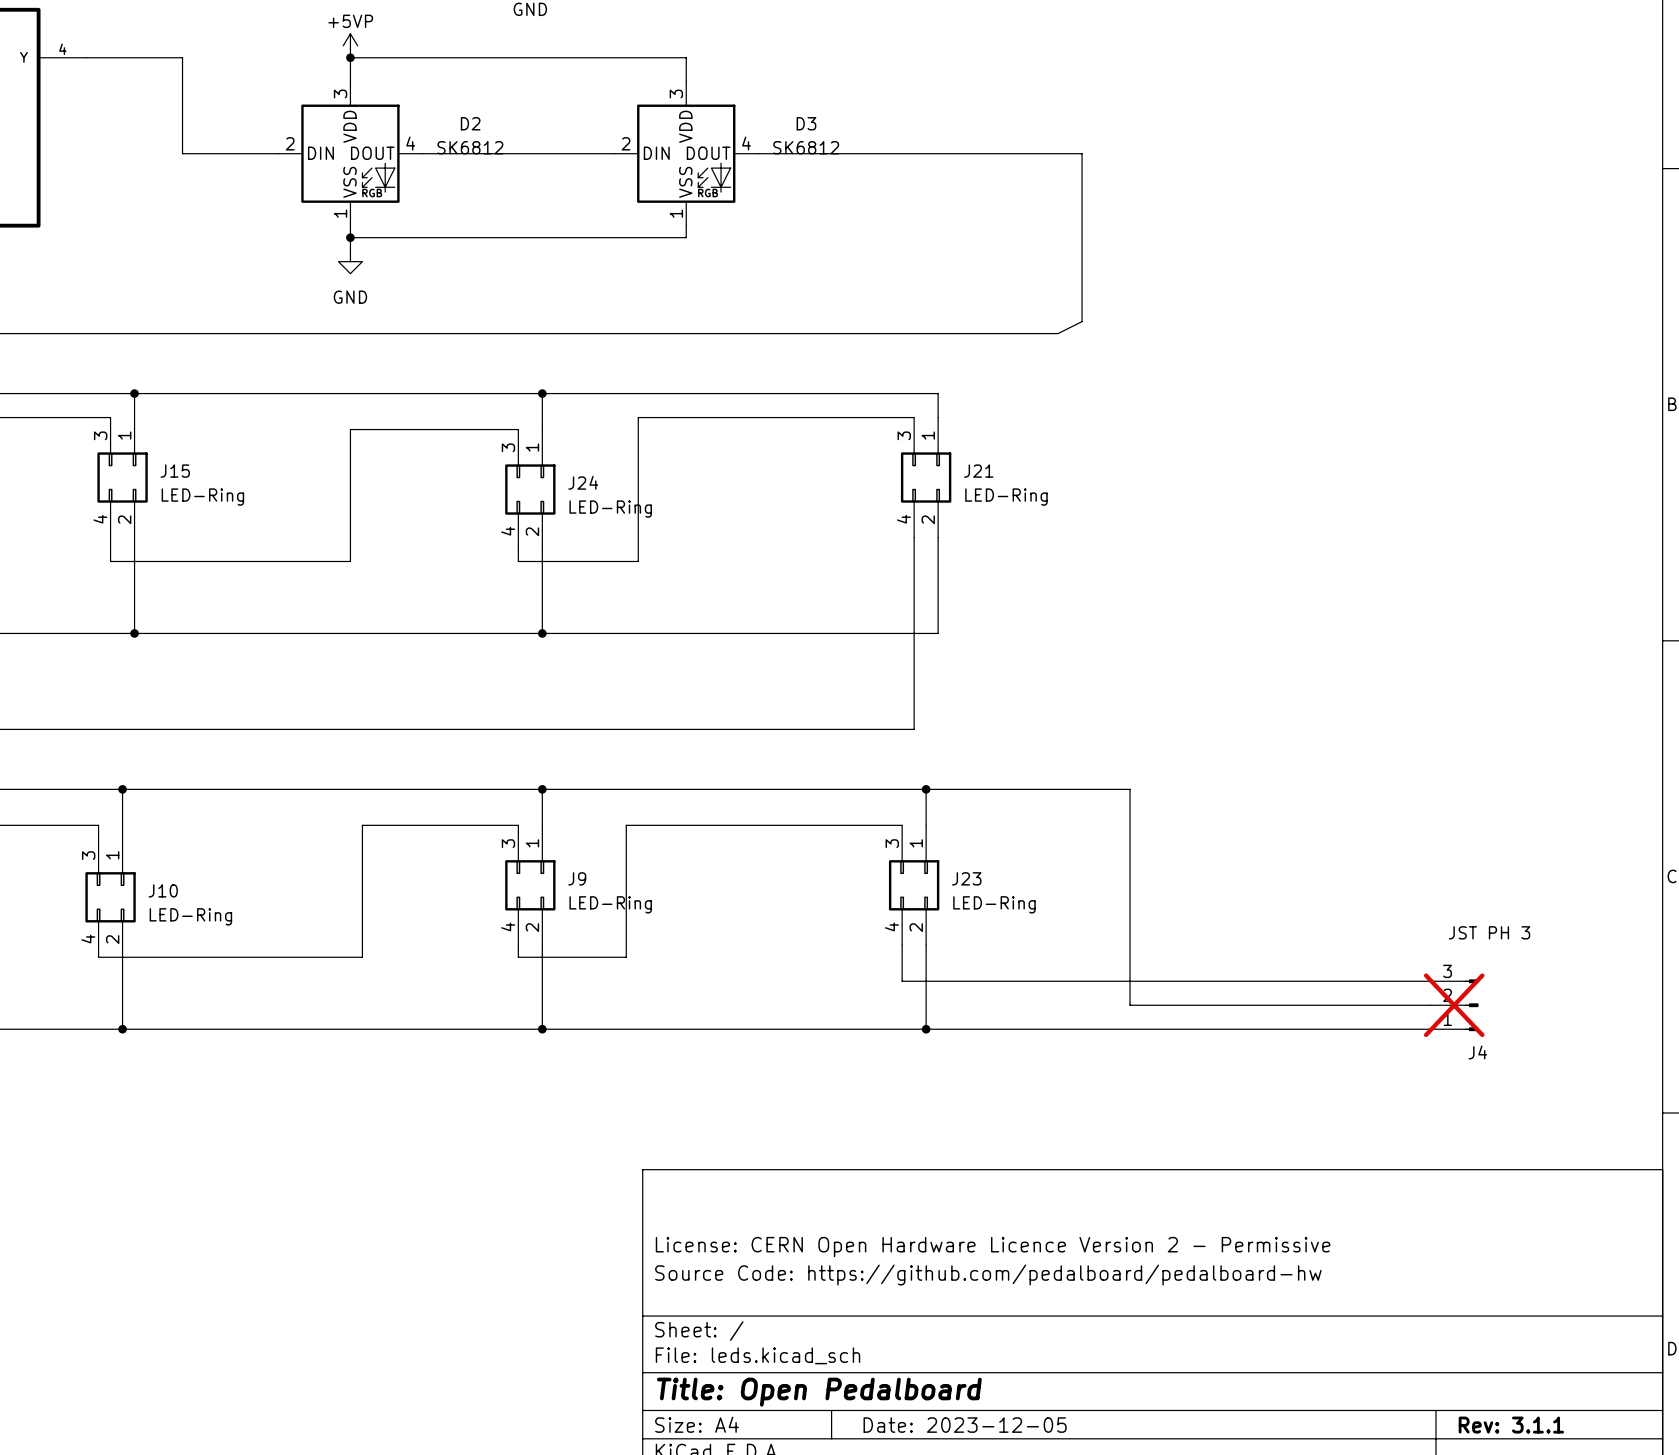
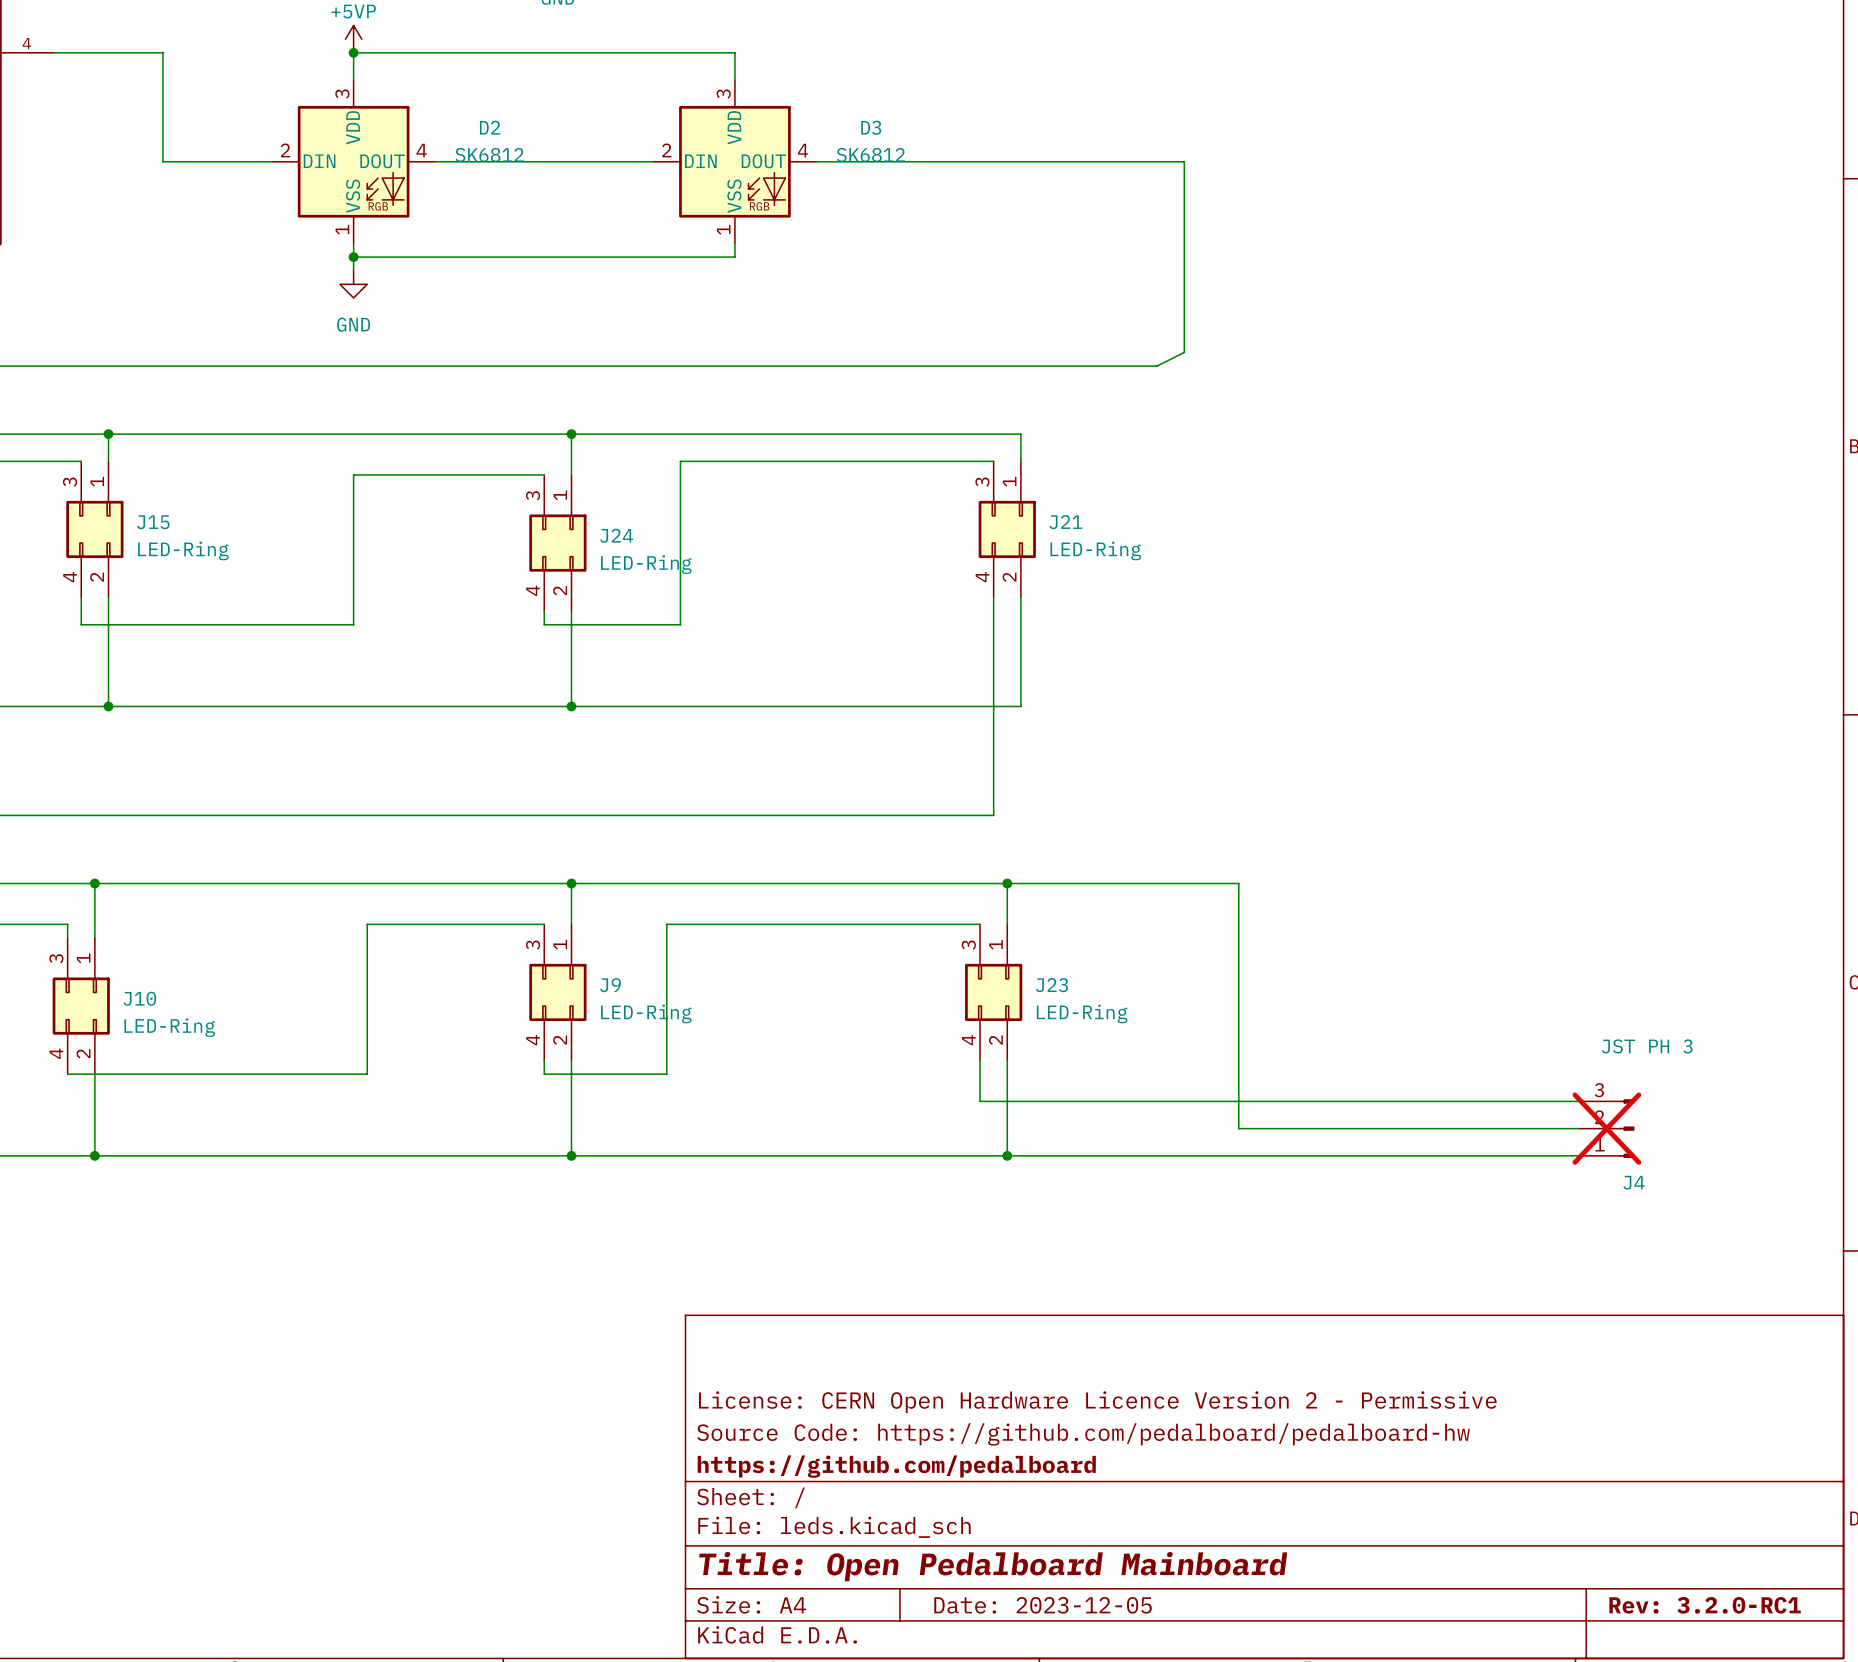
title block: none -> https://github.com/pedalboard (896, 1466)
title block: Title: Open Pedalboard (819, 1392) -> Title: Open Pedalboard Mainboard (993, 1566)
title block: Rev: 3.1.1 (1511, 1425) -> Rev: 3.2.0-RC1 (1705, 1605)

